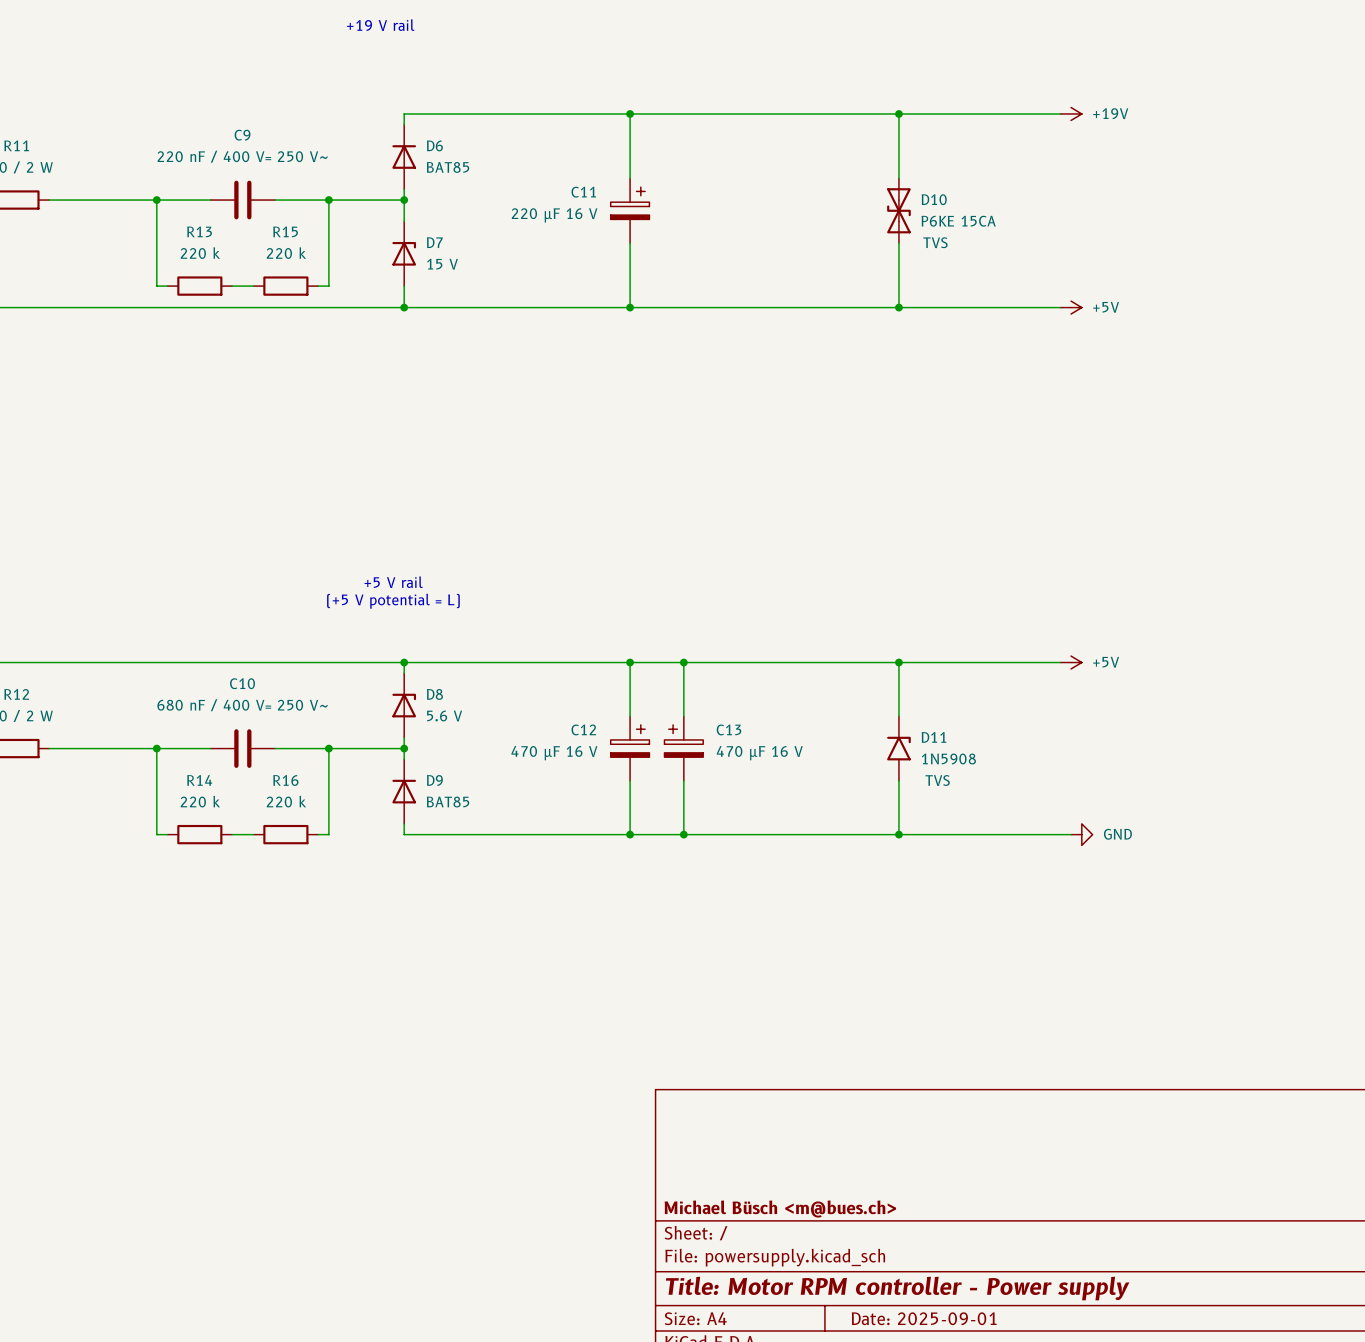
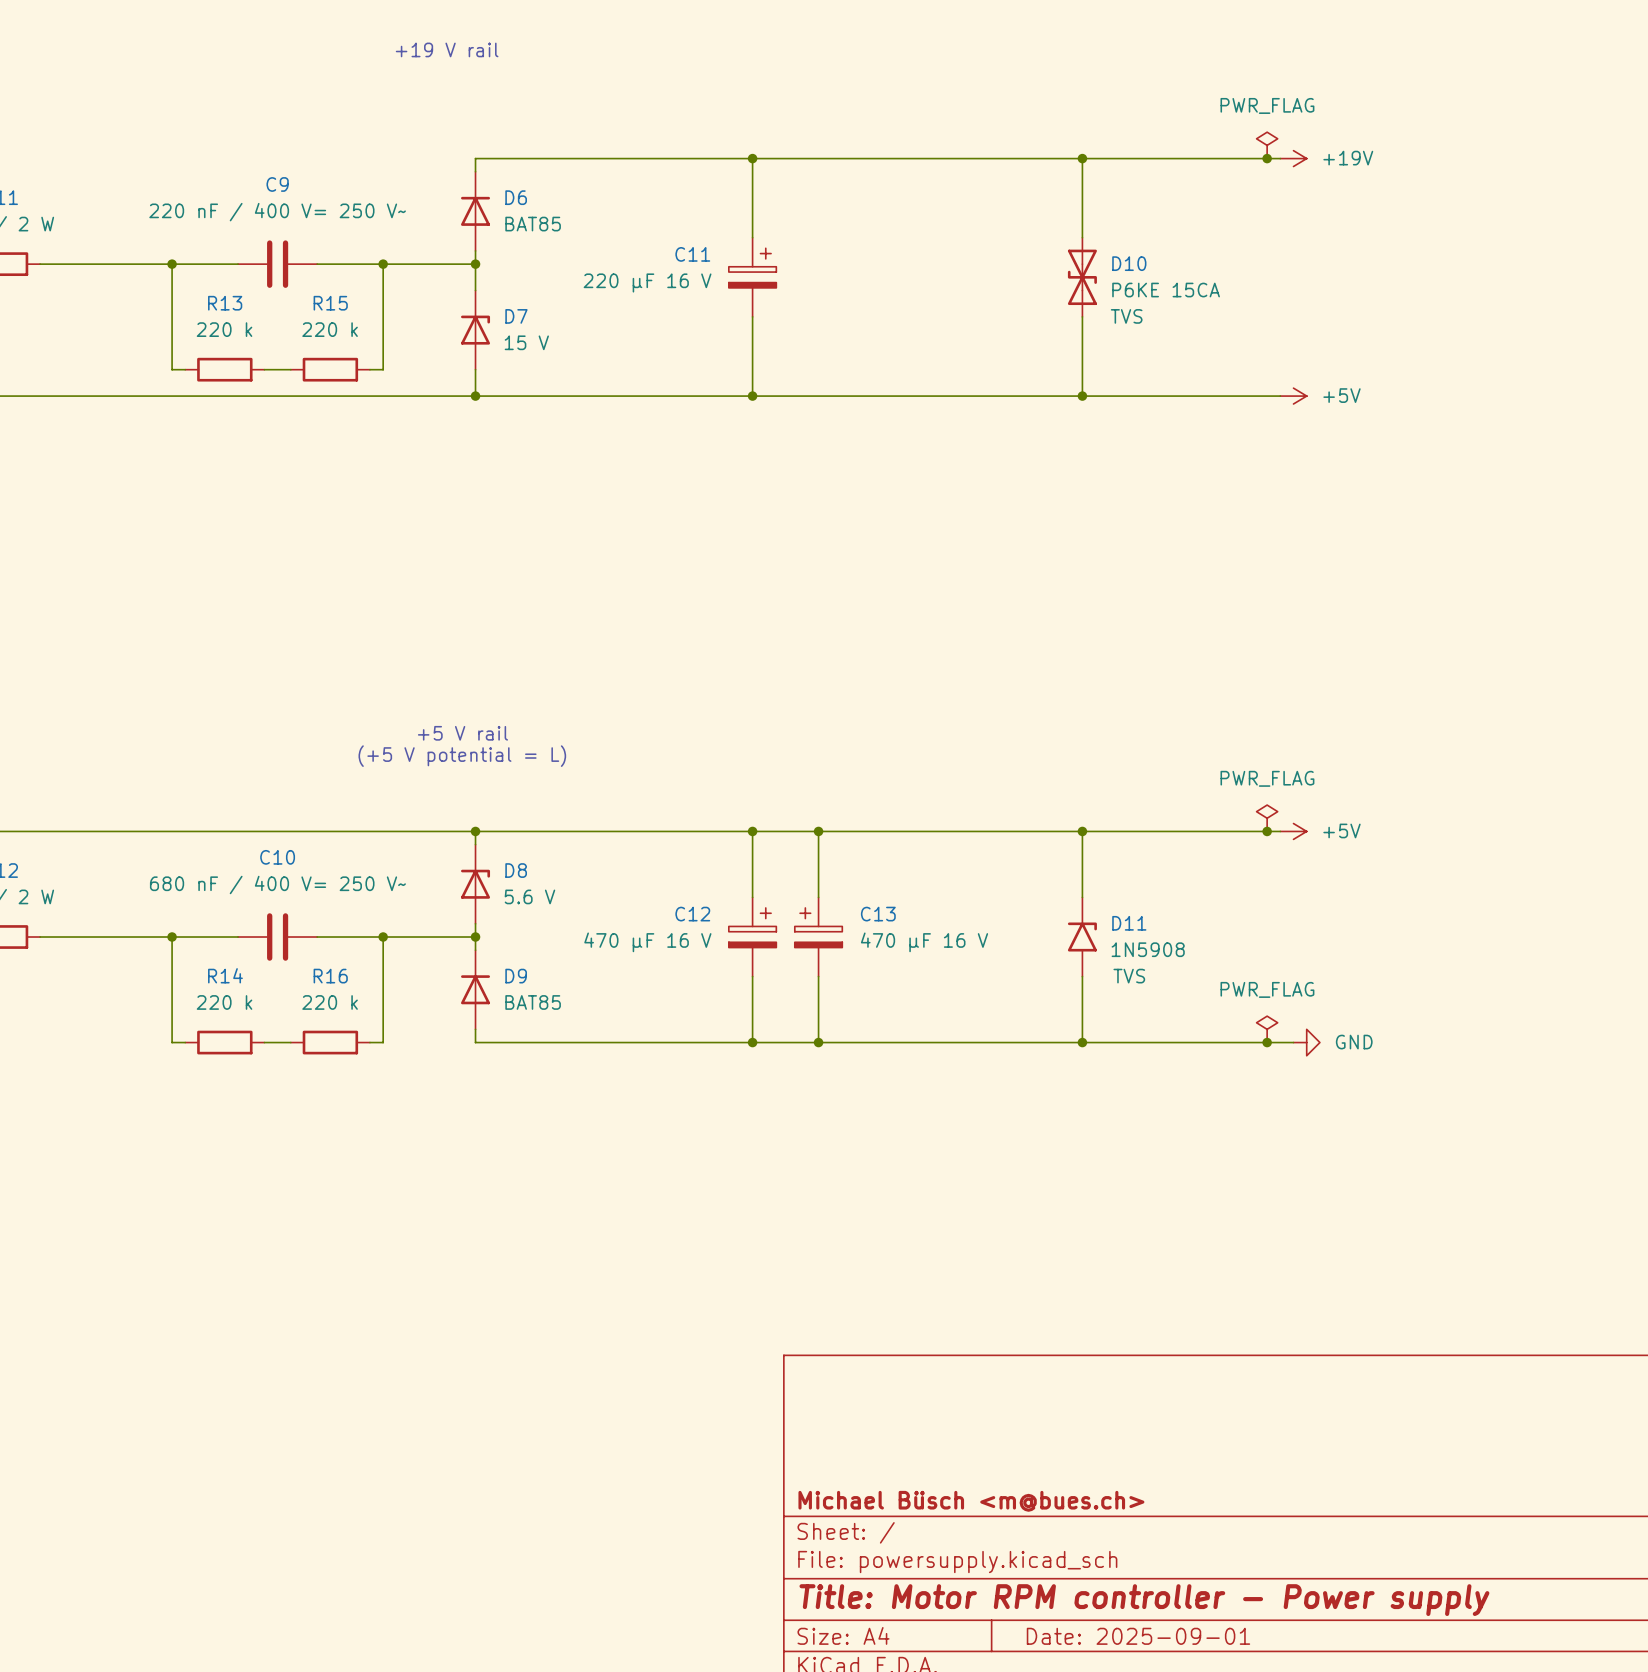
power symbol: none -> PWR_FLAG (1267, 145)
junction: none -> (1267, 158)
power symbol: none -> PWR_FLAG (1267, 818)
junction: none -> (1267, 831)
power symbol: none -> PWR_FLAG (1267, 1029)
junction: none -> (1267, 1042)

